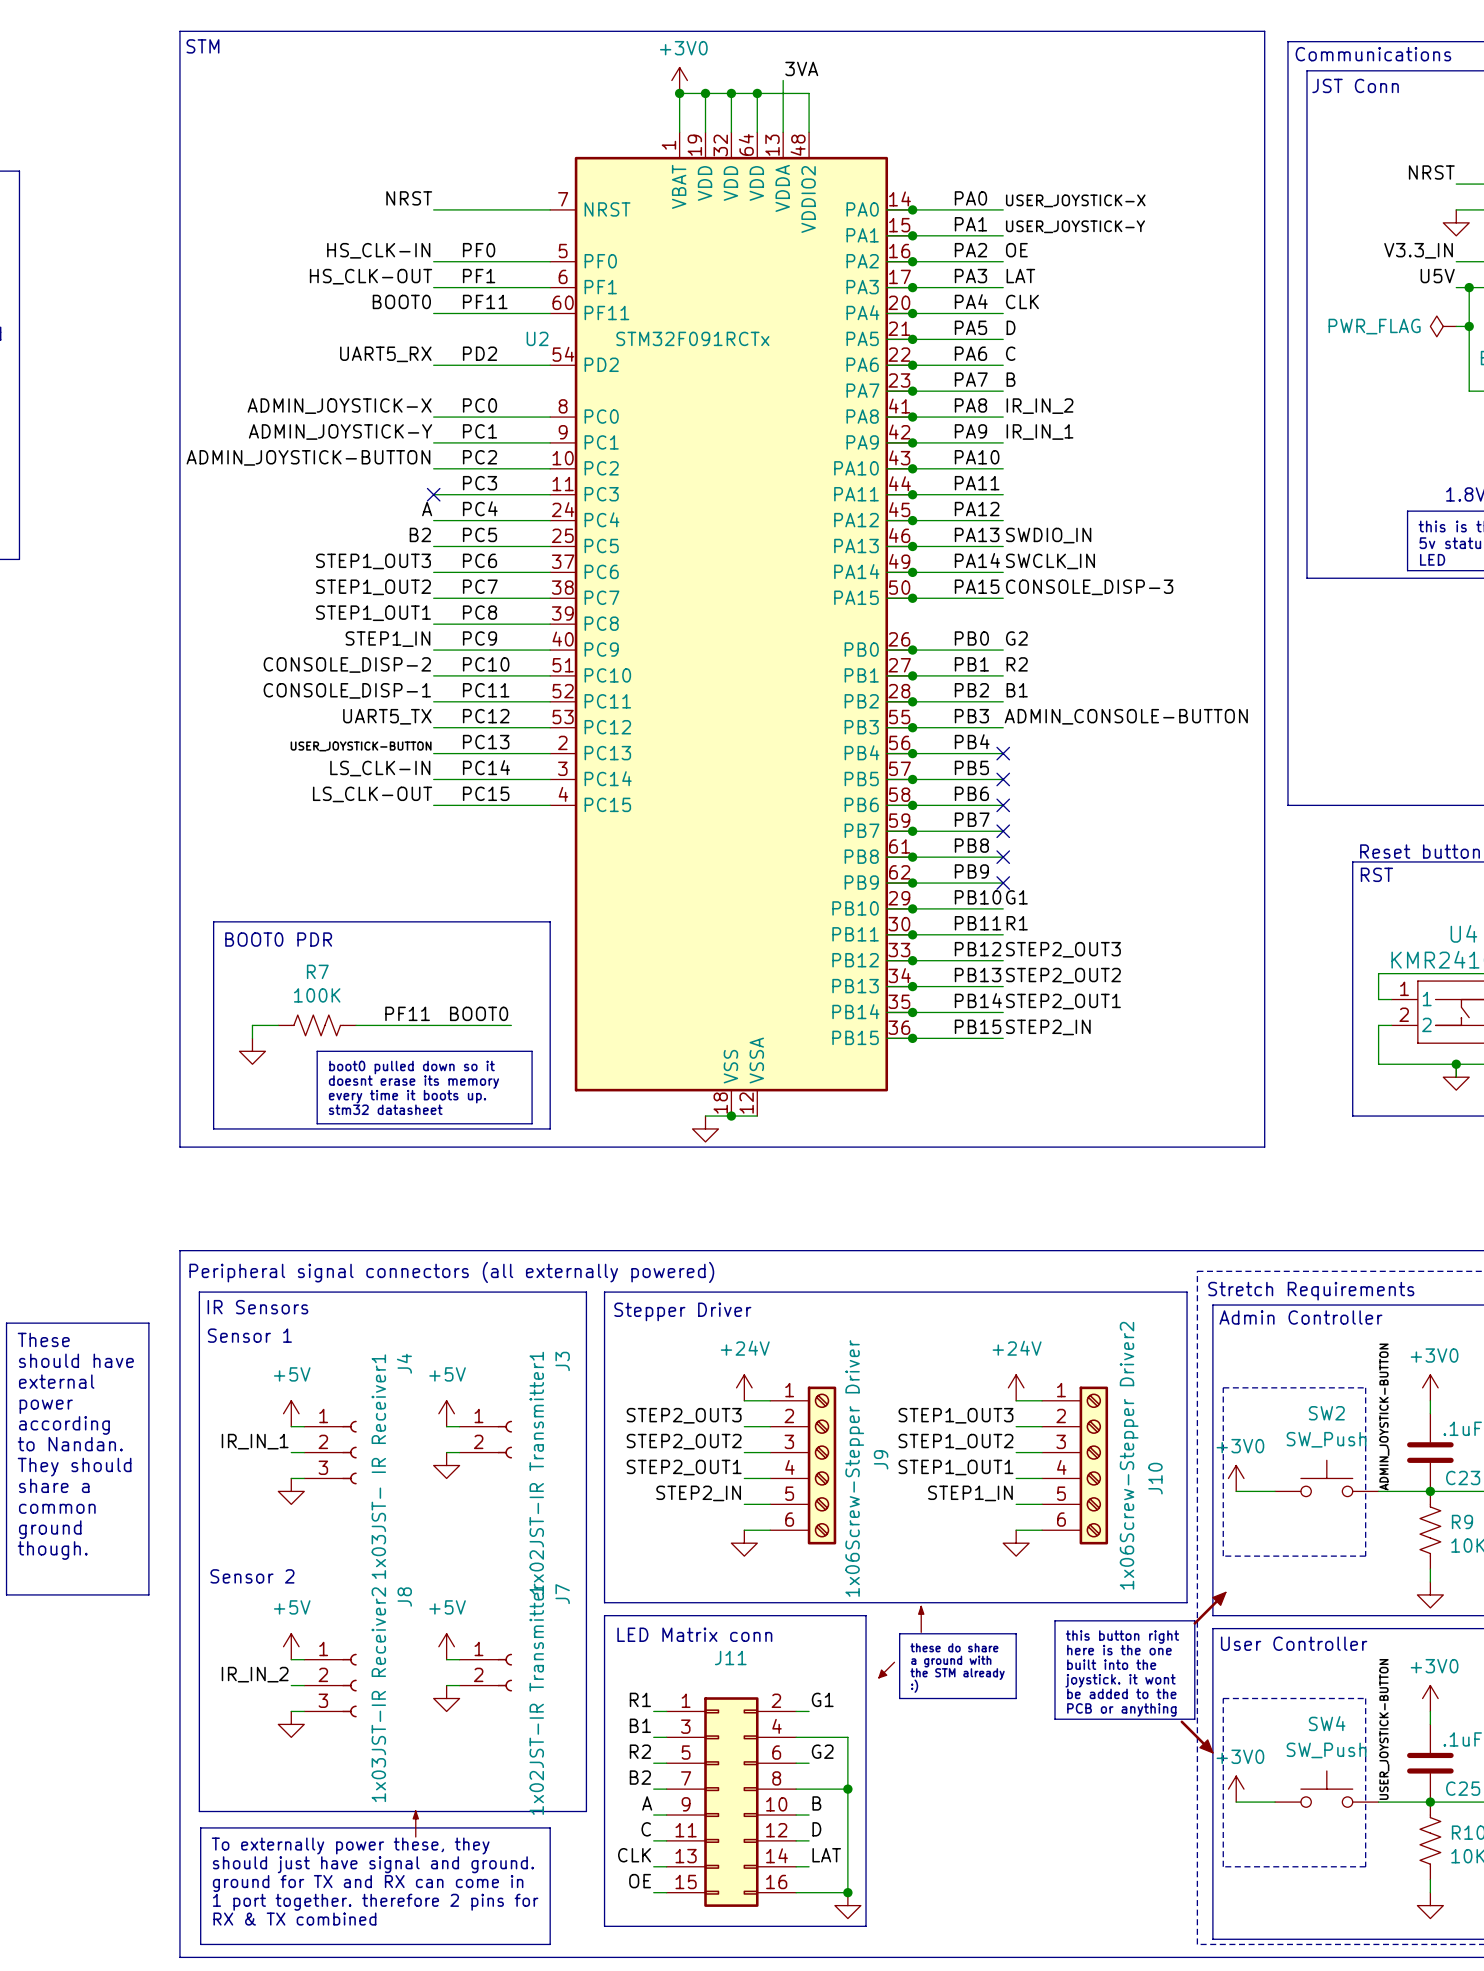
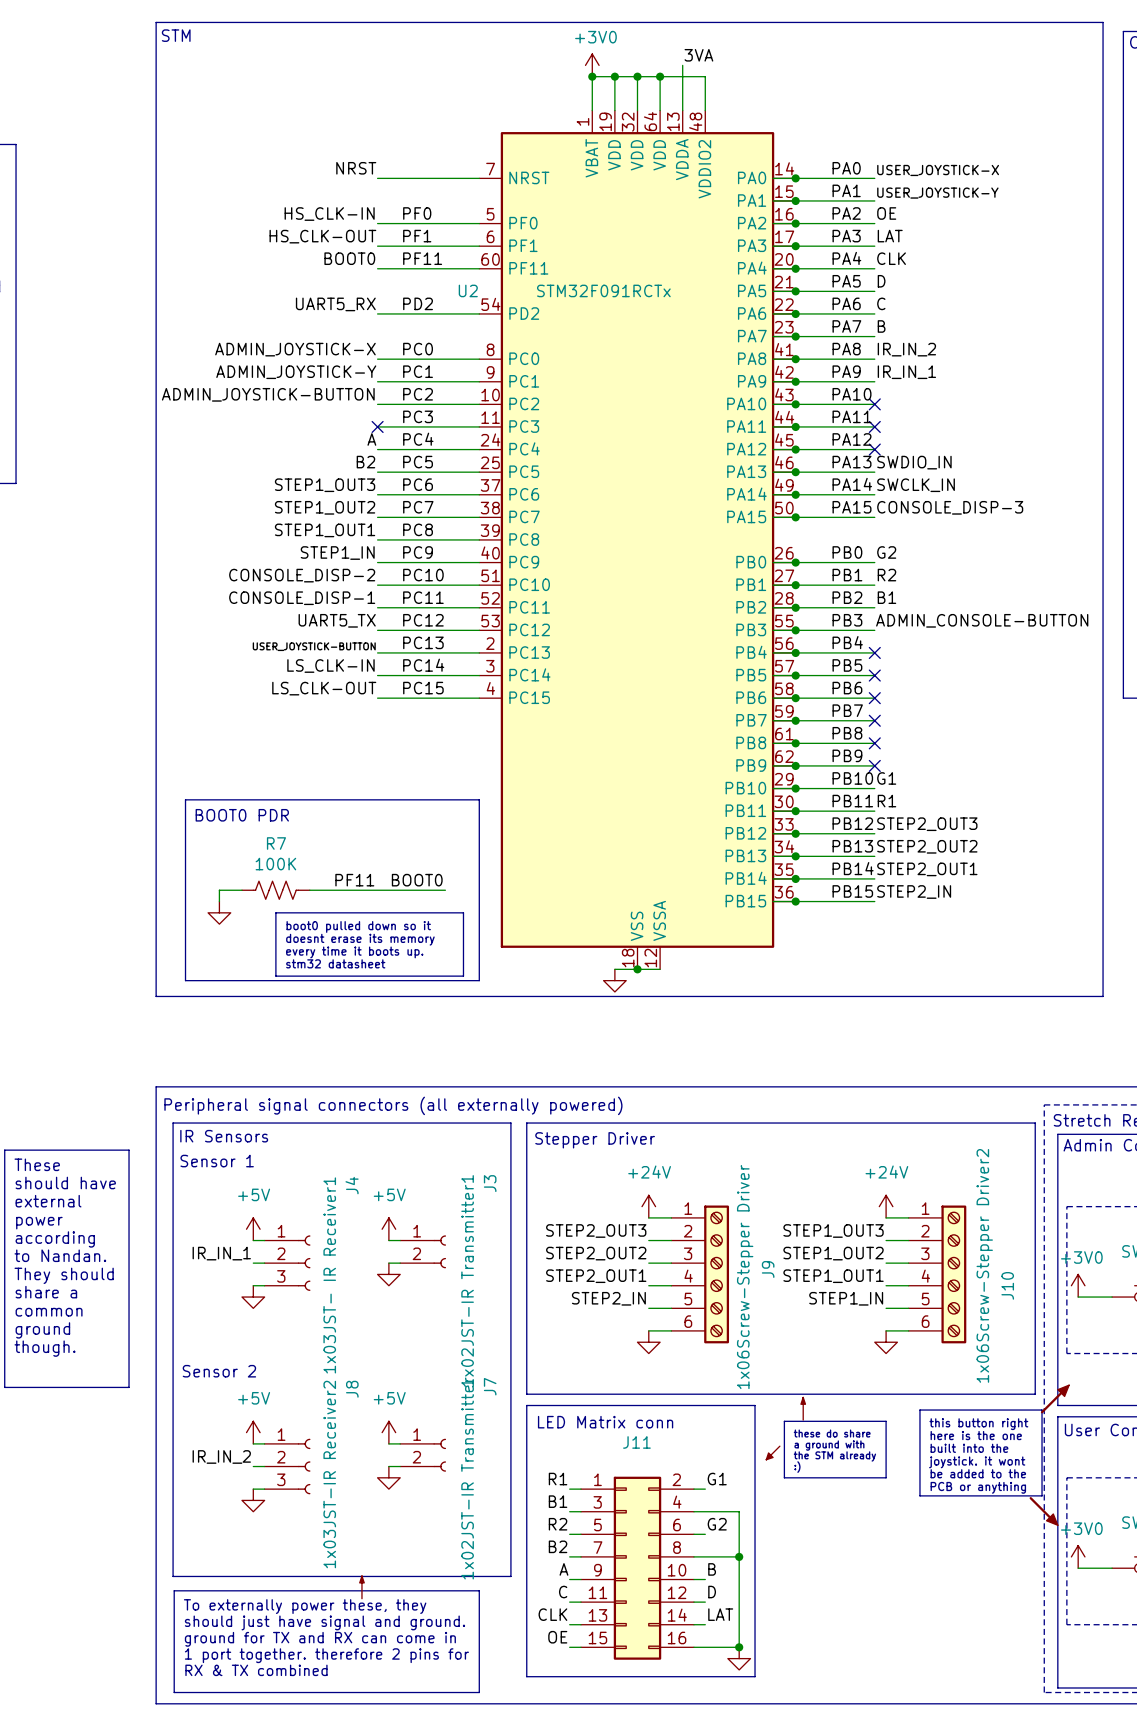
no-connect mark: none -> (874, 404)
no-connect mark: none -> (874, 426)
no-connect mark: none -> (874, 449)

